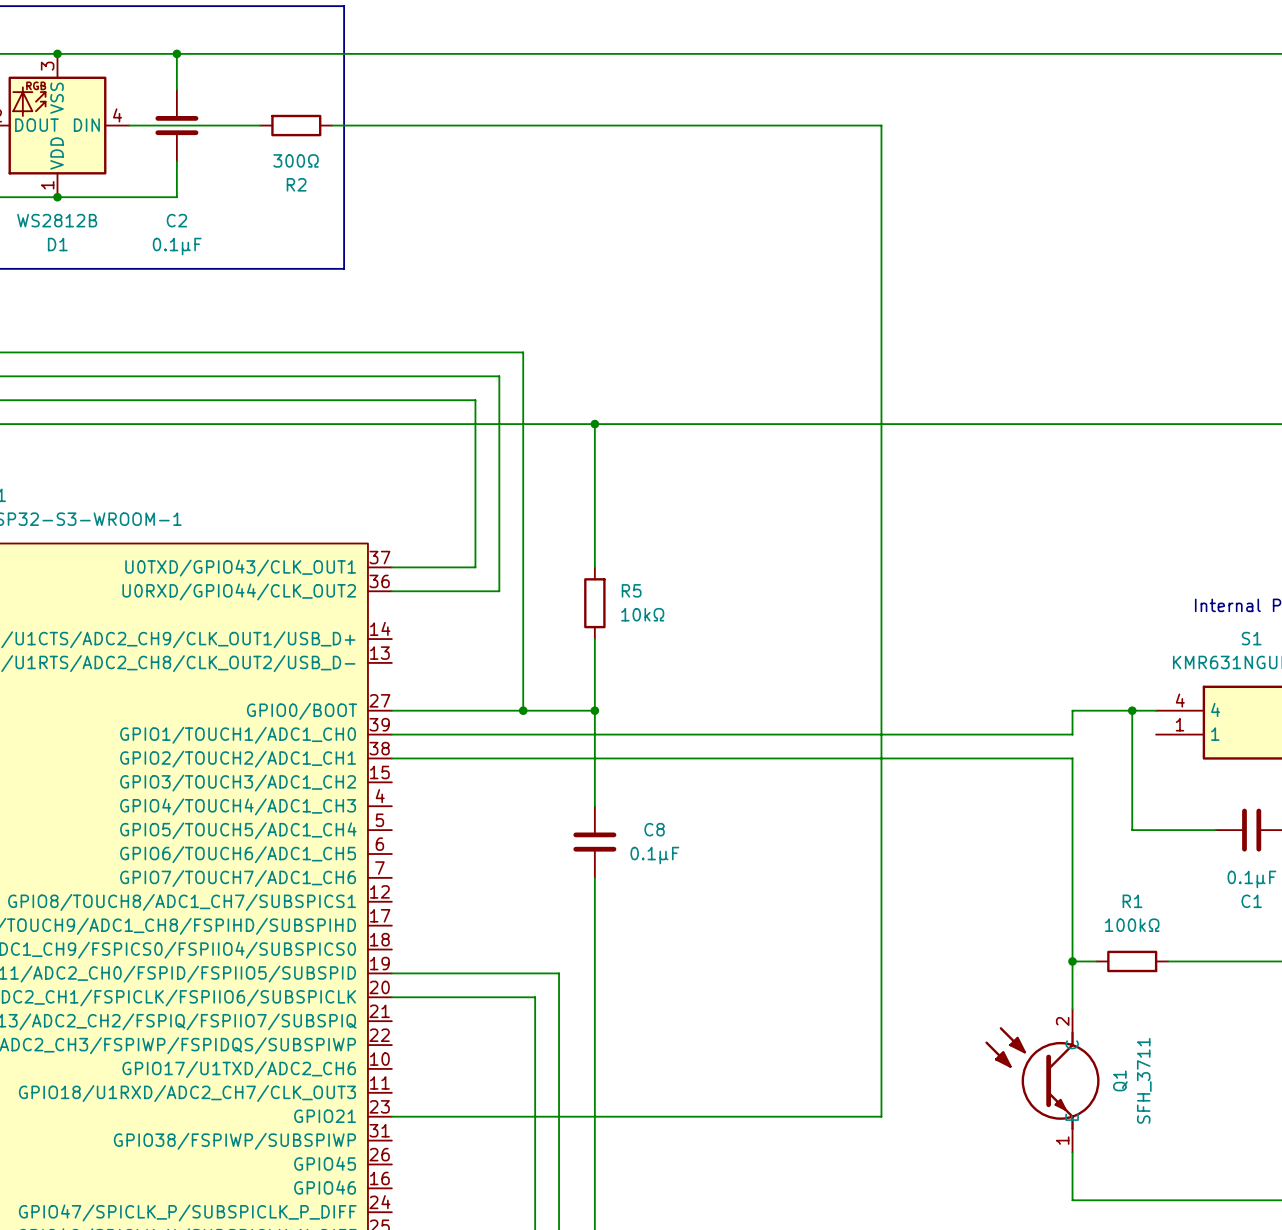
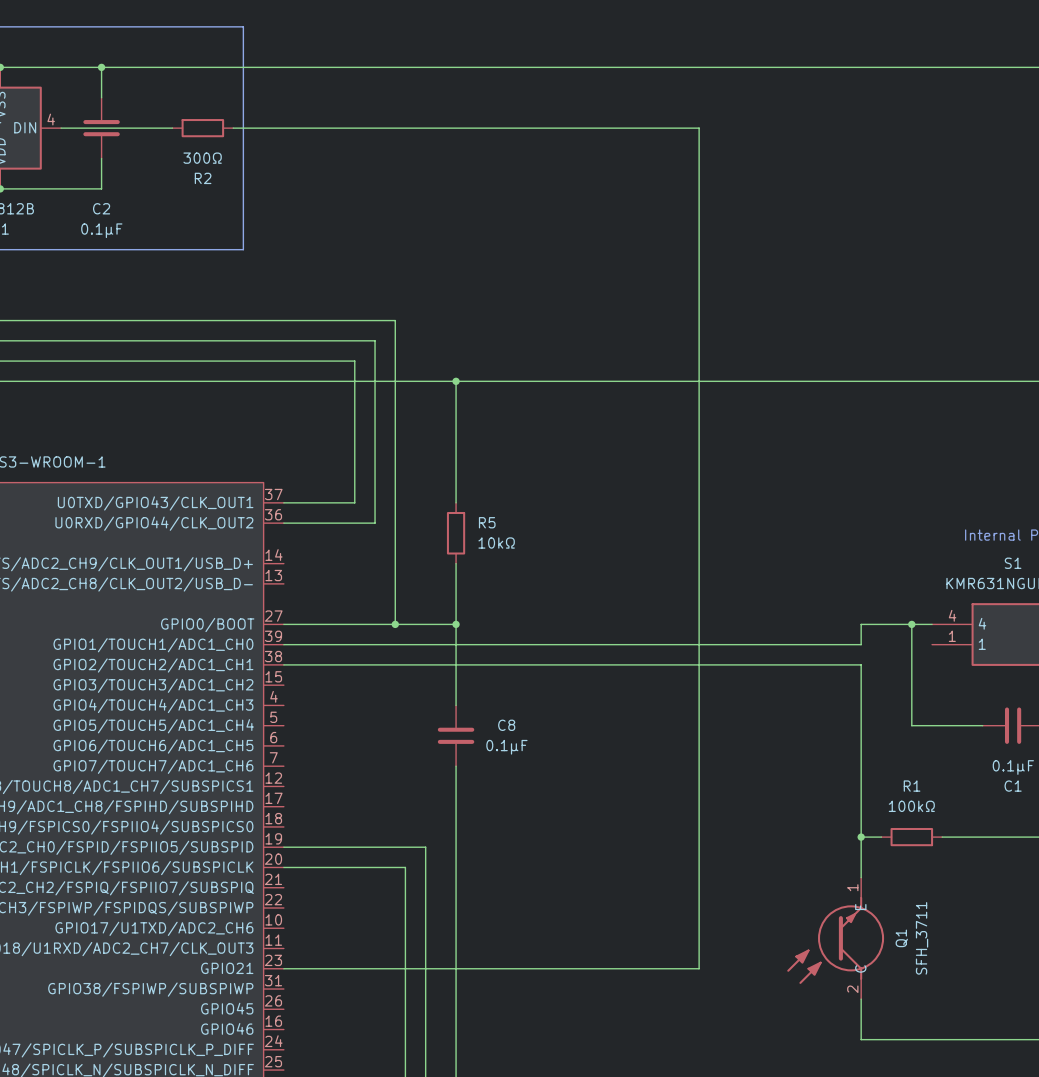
Q1 flip: as is (1042, 1078) -> up-down (835, 940)

